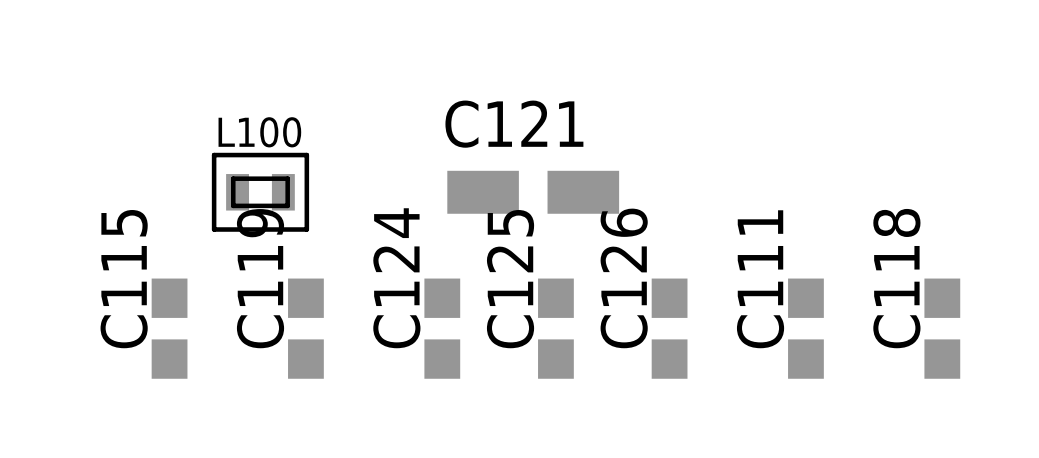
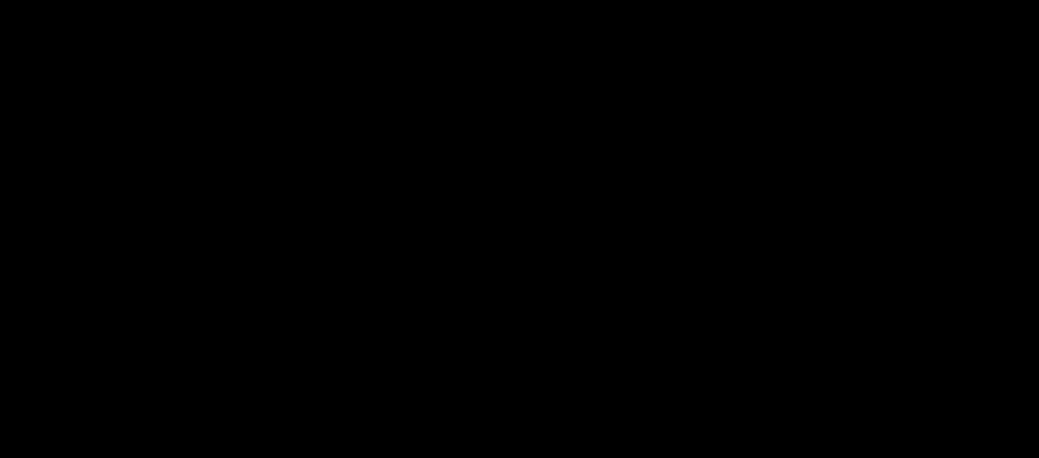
L100: (260, 192) -> none
C121: (533, 192) -> none
C115: (169, 328) -> none
C119: (305, 328) -> none
C124: (442, 328) -> none
C125: (555, 328) -> none
C126: (669, 328) -> none
C111: (805, 328) -> none
C118: (942, 328) -> none

